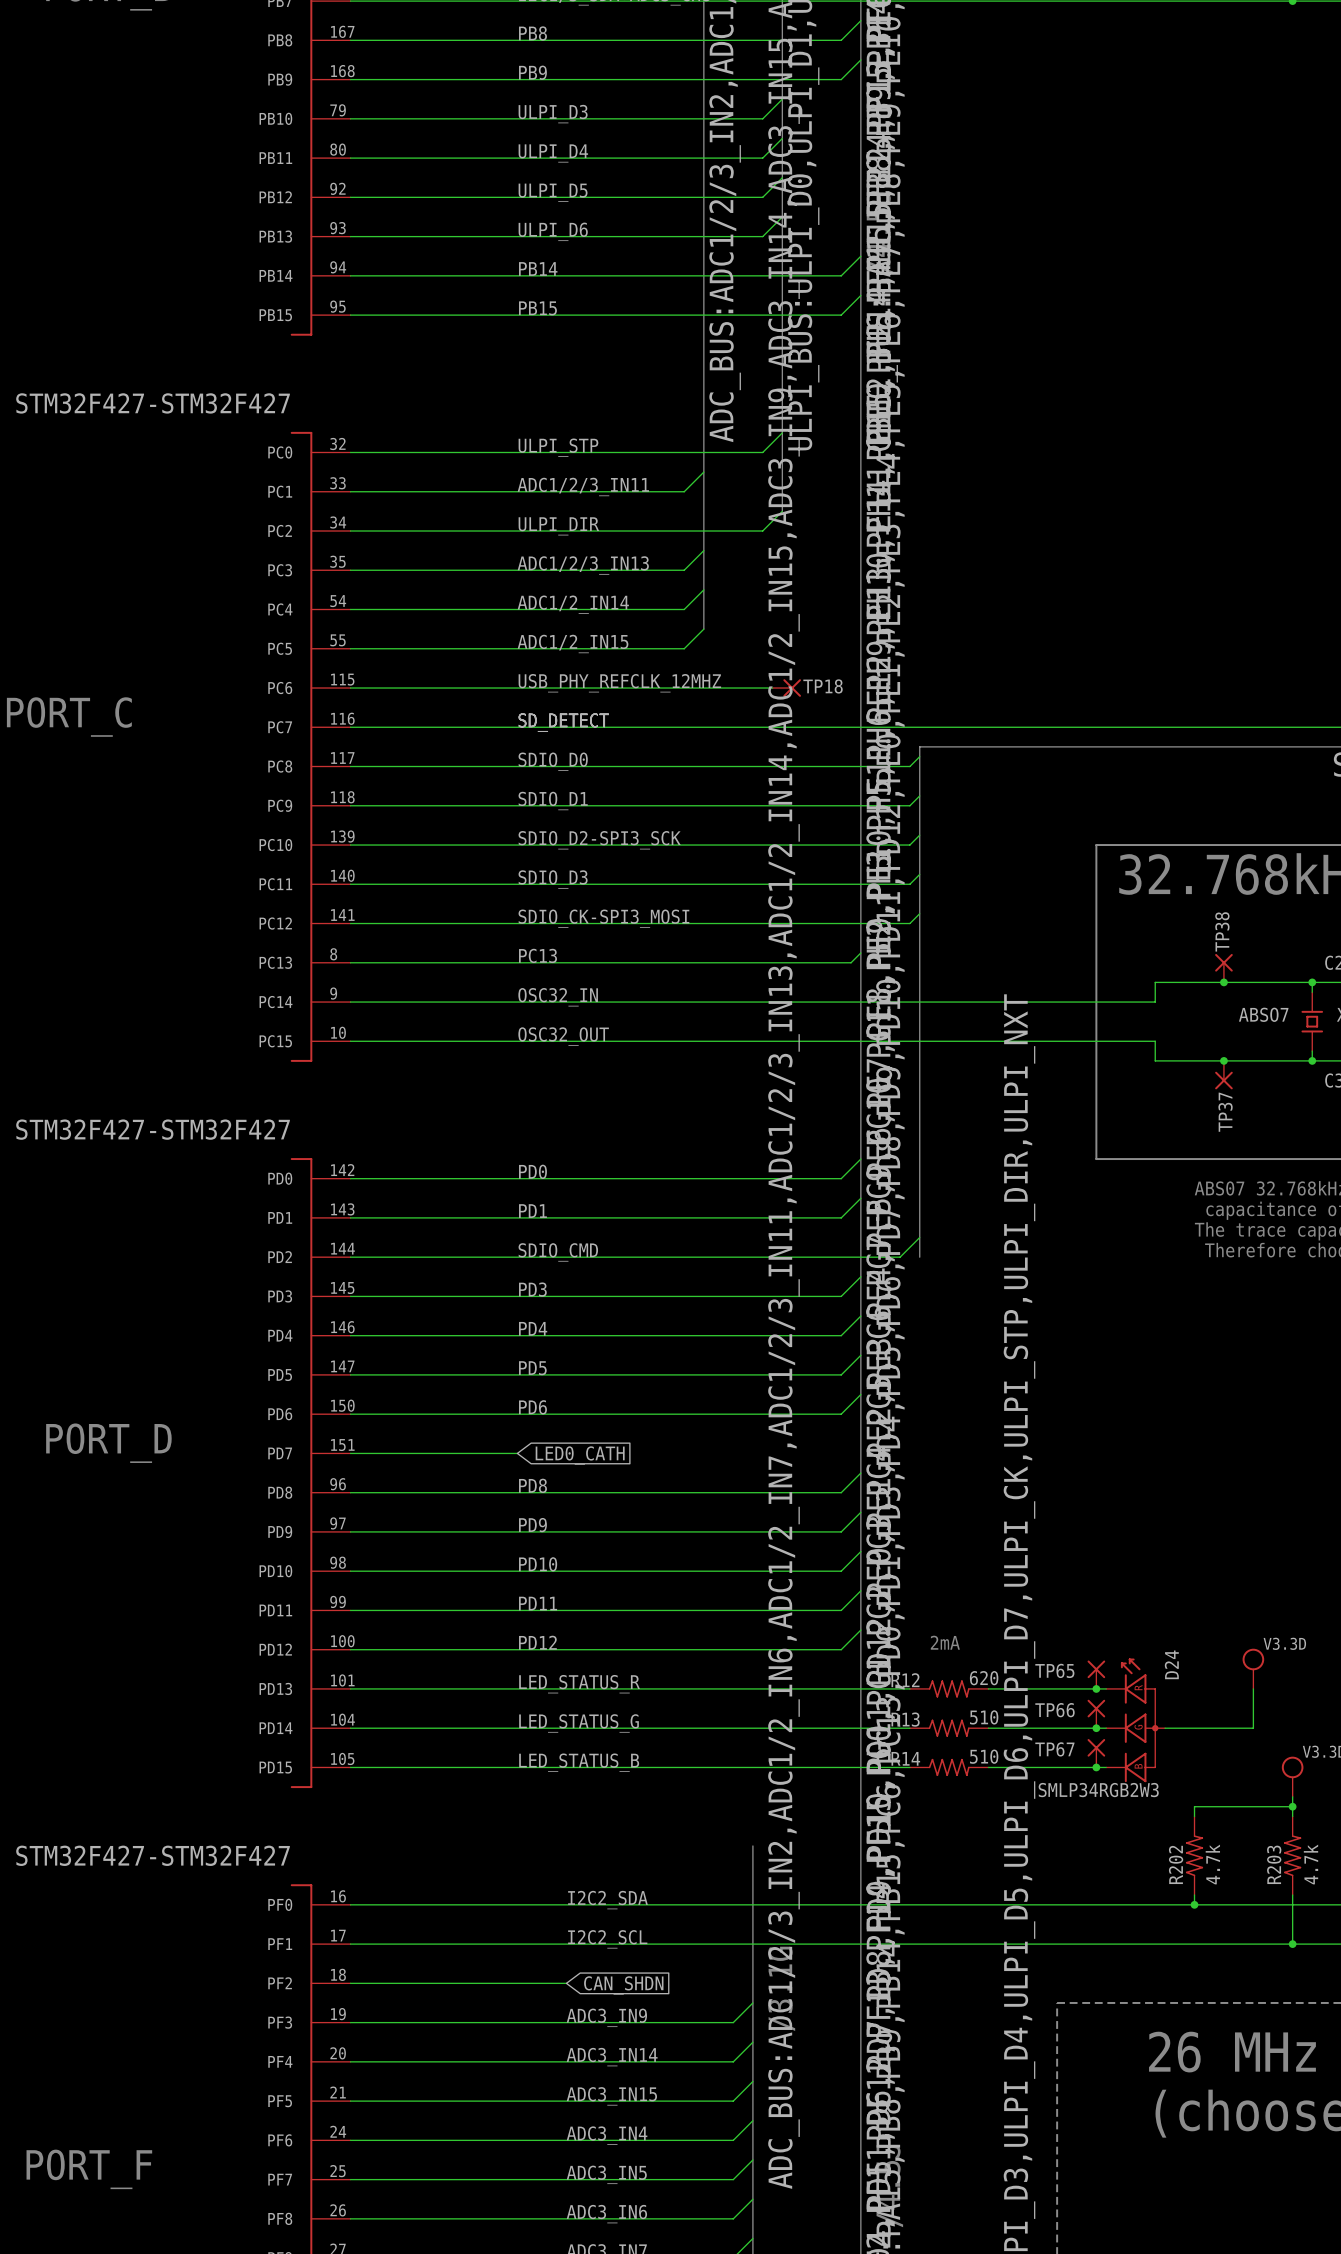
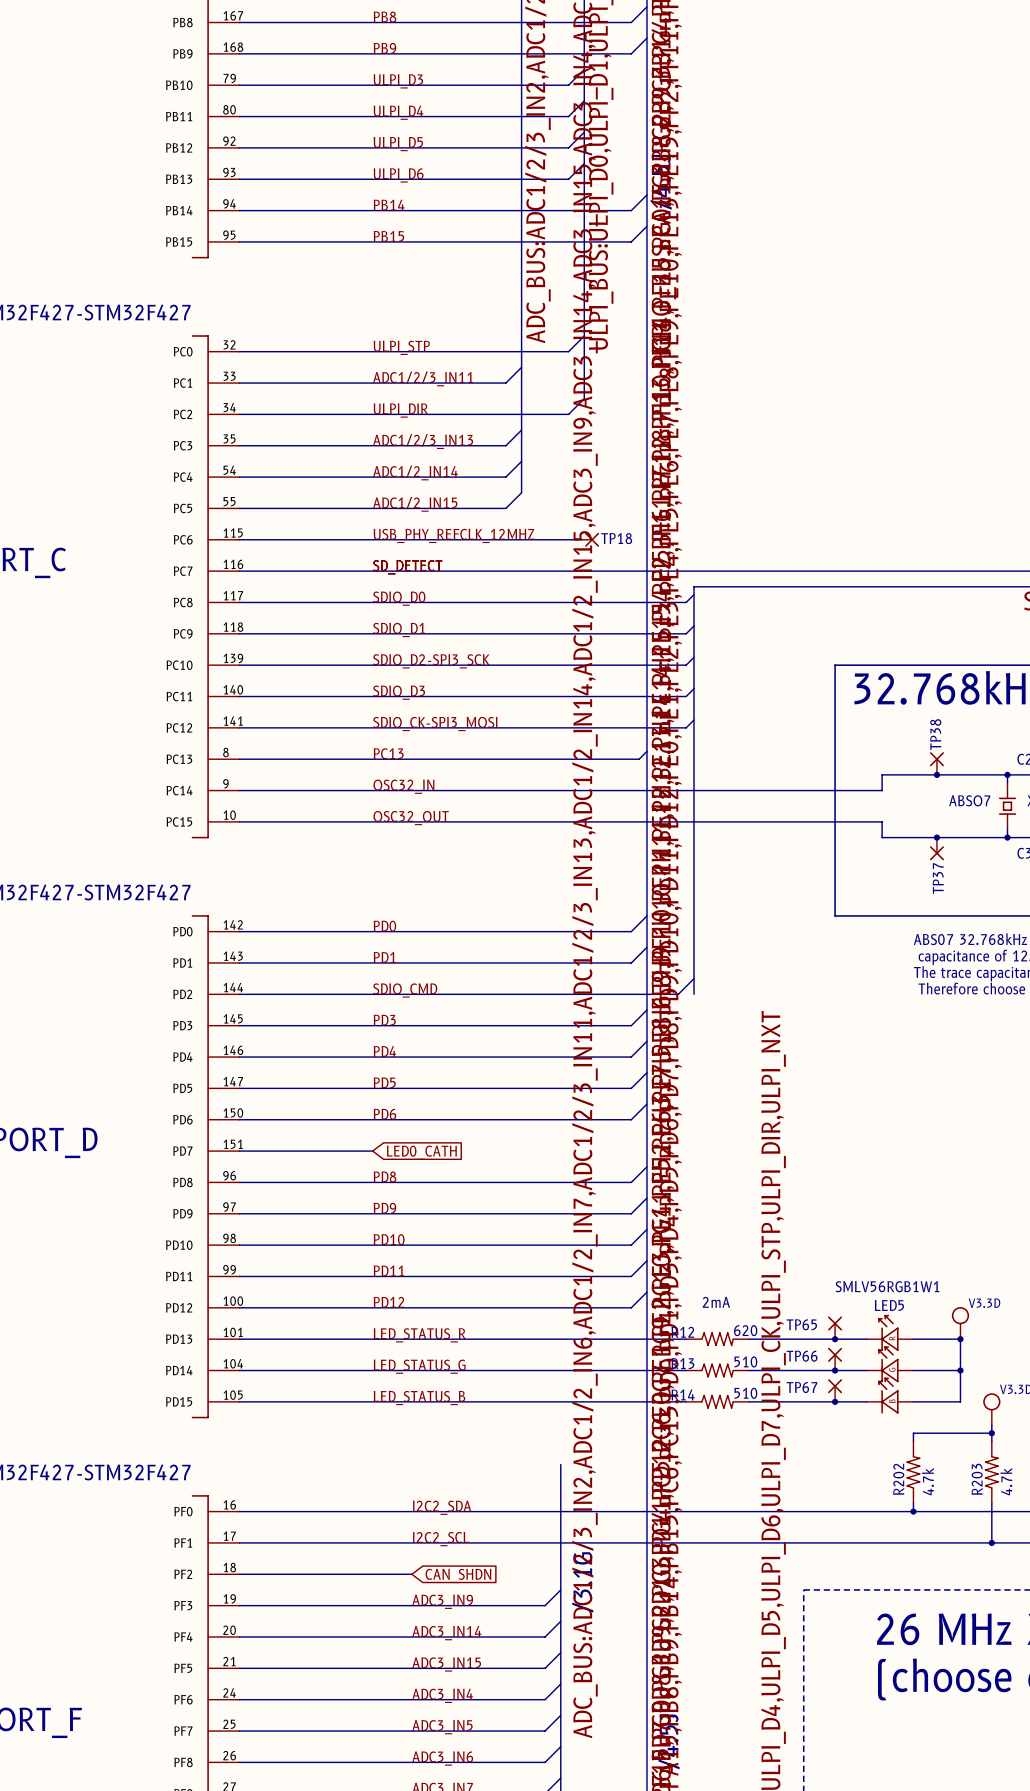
LED5: none -> SMLV56RGB1W1 (889, 1332)
wire: none -> (913, 1339) (960, 1339)
junction: none -> (960, 1339)
D24: SMLP34RGB2W3 (1135, 1720) -> none
part: none -> (889, 1364)
wire: none -> (960, 1370) (960, 1401) (913, 1401)
junction: none -> (960, 1370)
part: none -> (889, 1395)

